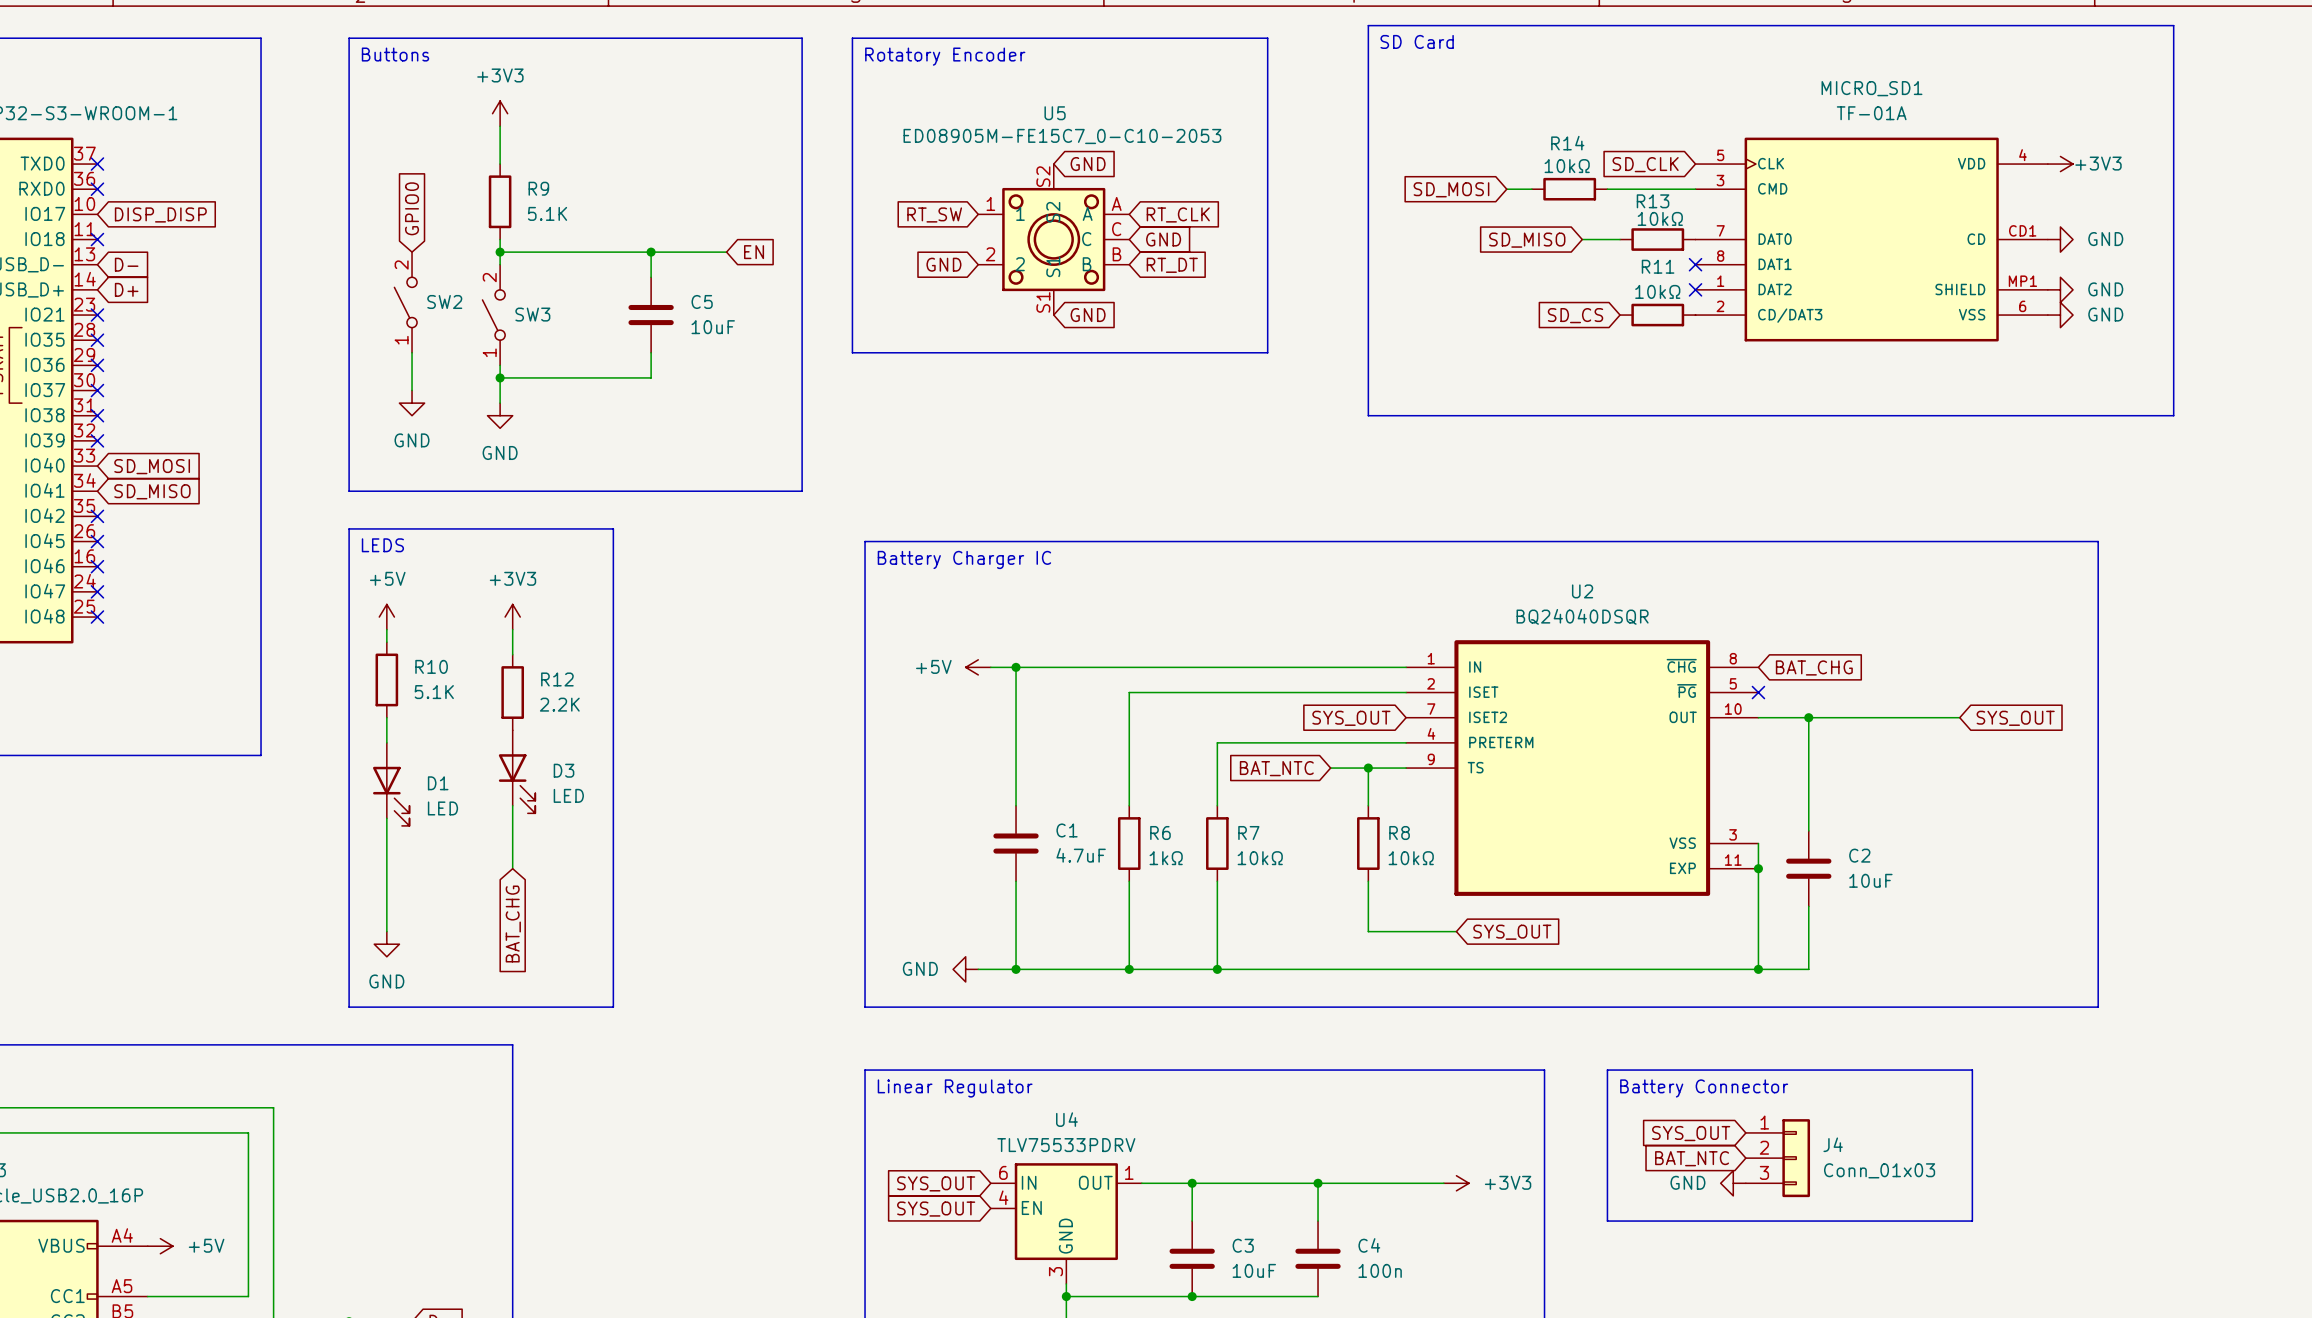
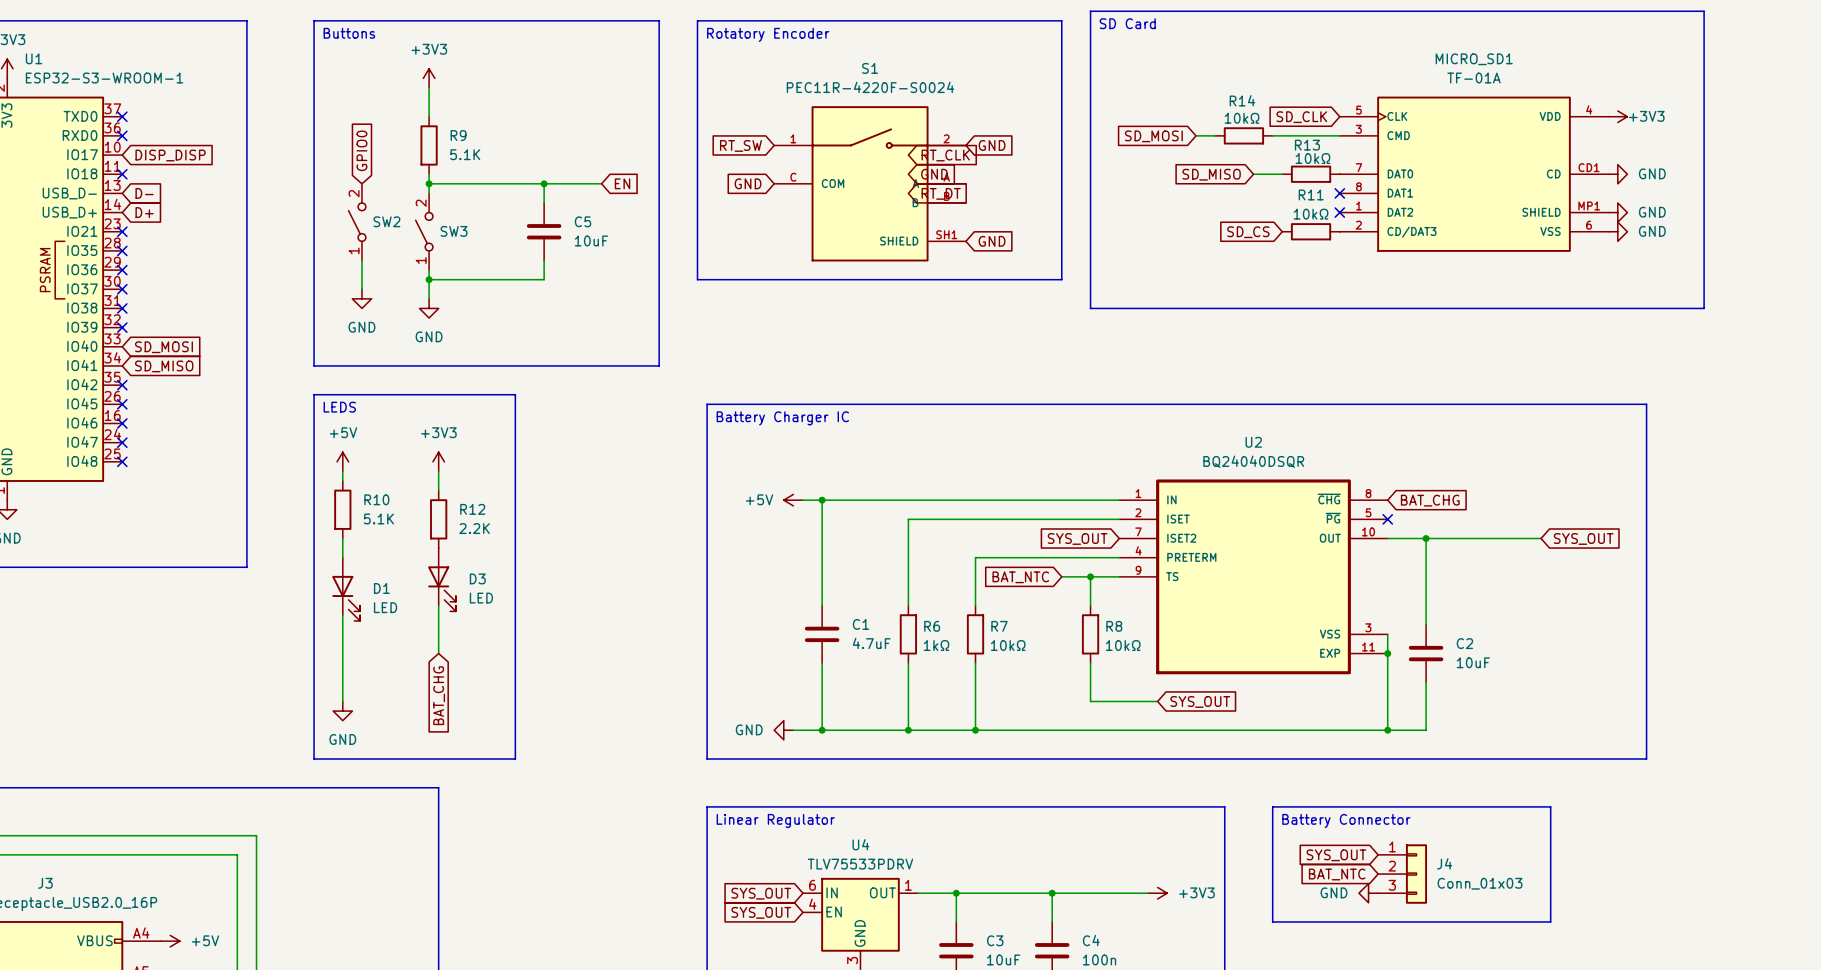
line: (1267, 38) (1267, 352) (852, 352) -> (1013, 20) (1061, 20) (1061, 279) (697, 279) (697, 260)
global label: GND (1088, 164) -> none
global label: none -> GND (992, 145)
global label position: RT_SW (934, 214) -> RT_SW (740, 145)
U5: ED08905M-FE15C7_0-C10-2053 (1053, 239) -> none
S1: none -> PEC11R-4220F-S0024 (870, 183)
global label position: GND (943, 264) -> GND (748, 183)
global label: GND (1088, 315) -> none
global label: none -> GND (992, 241)

